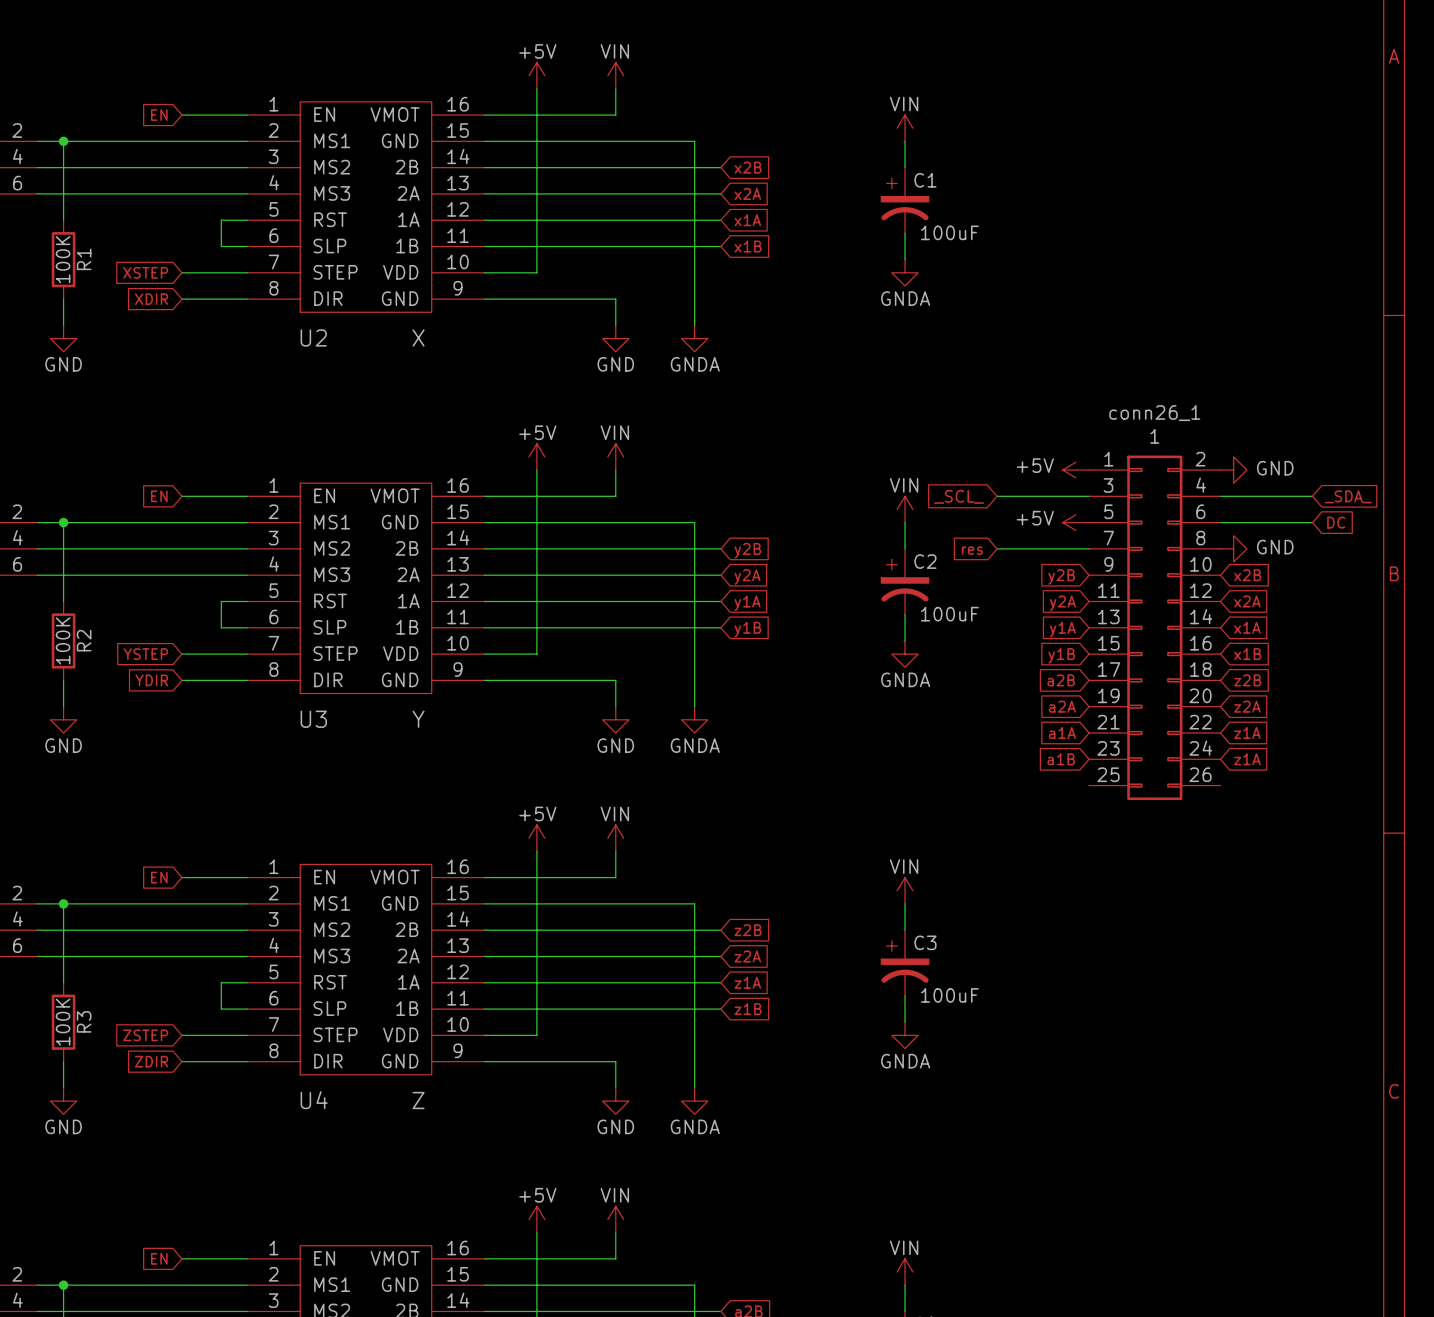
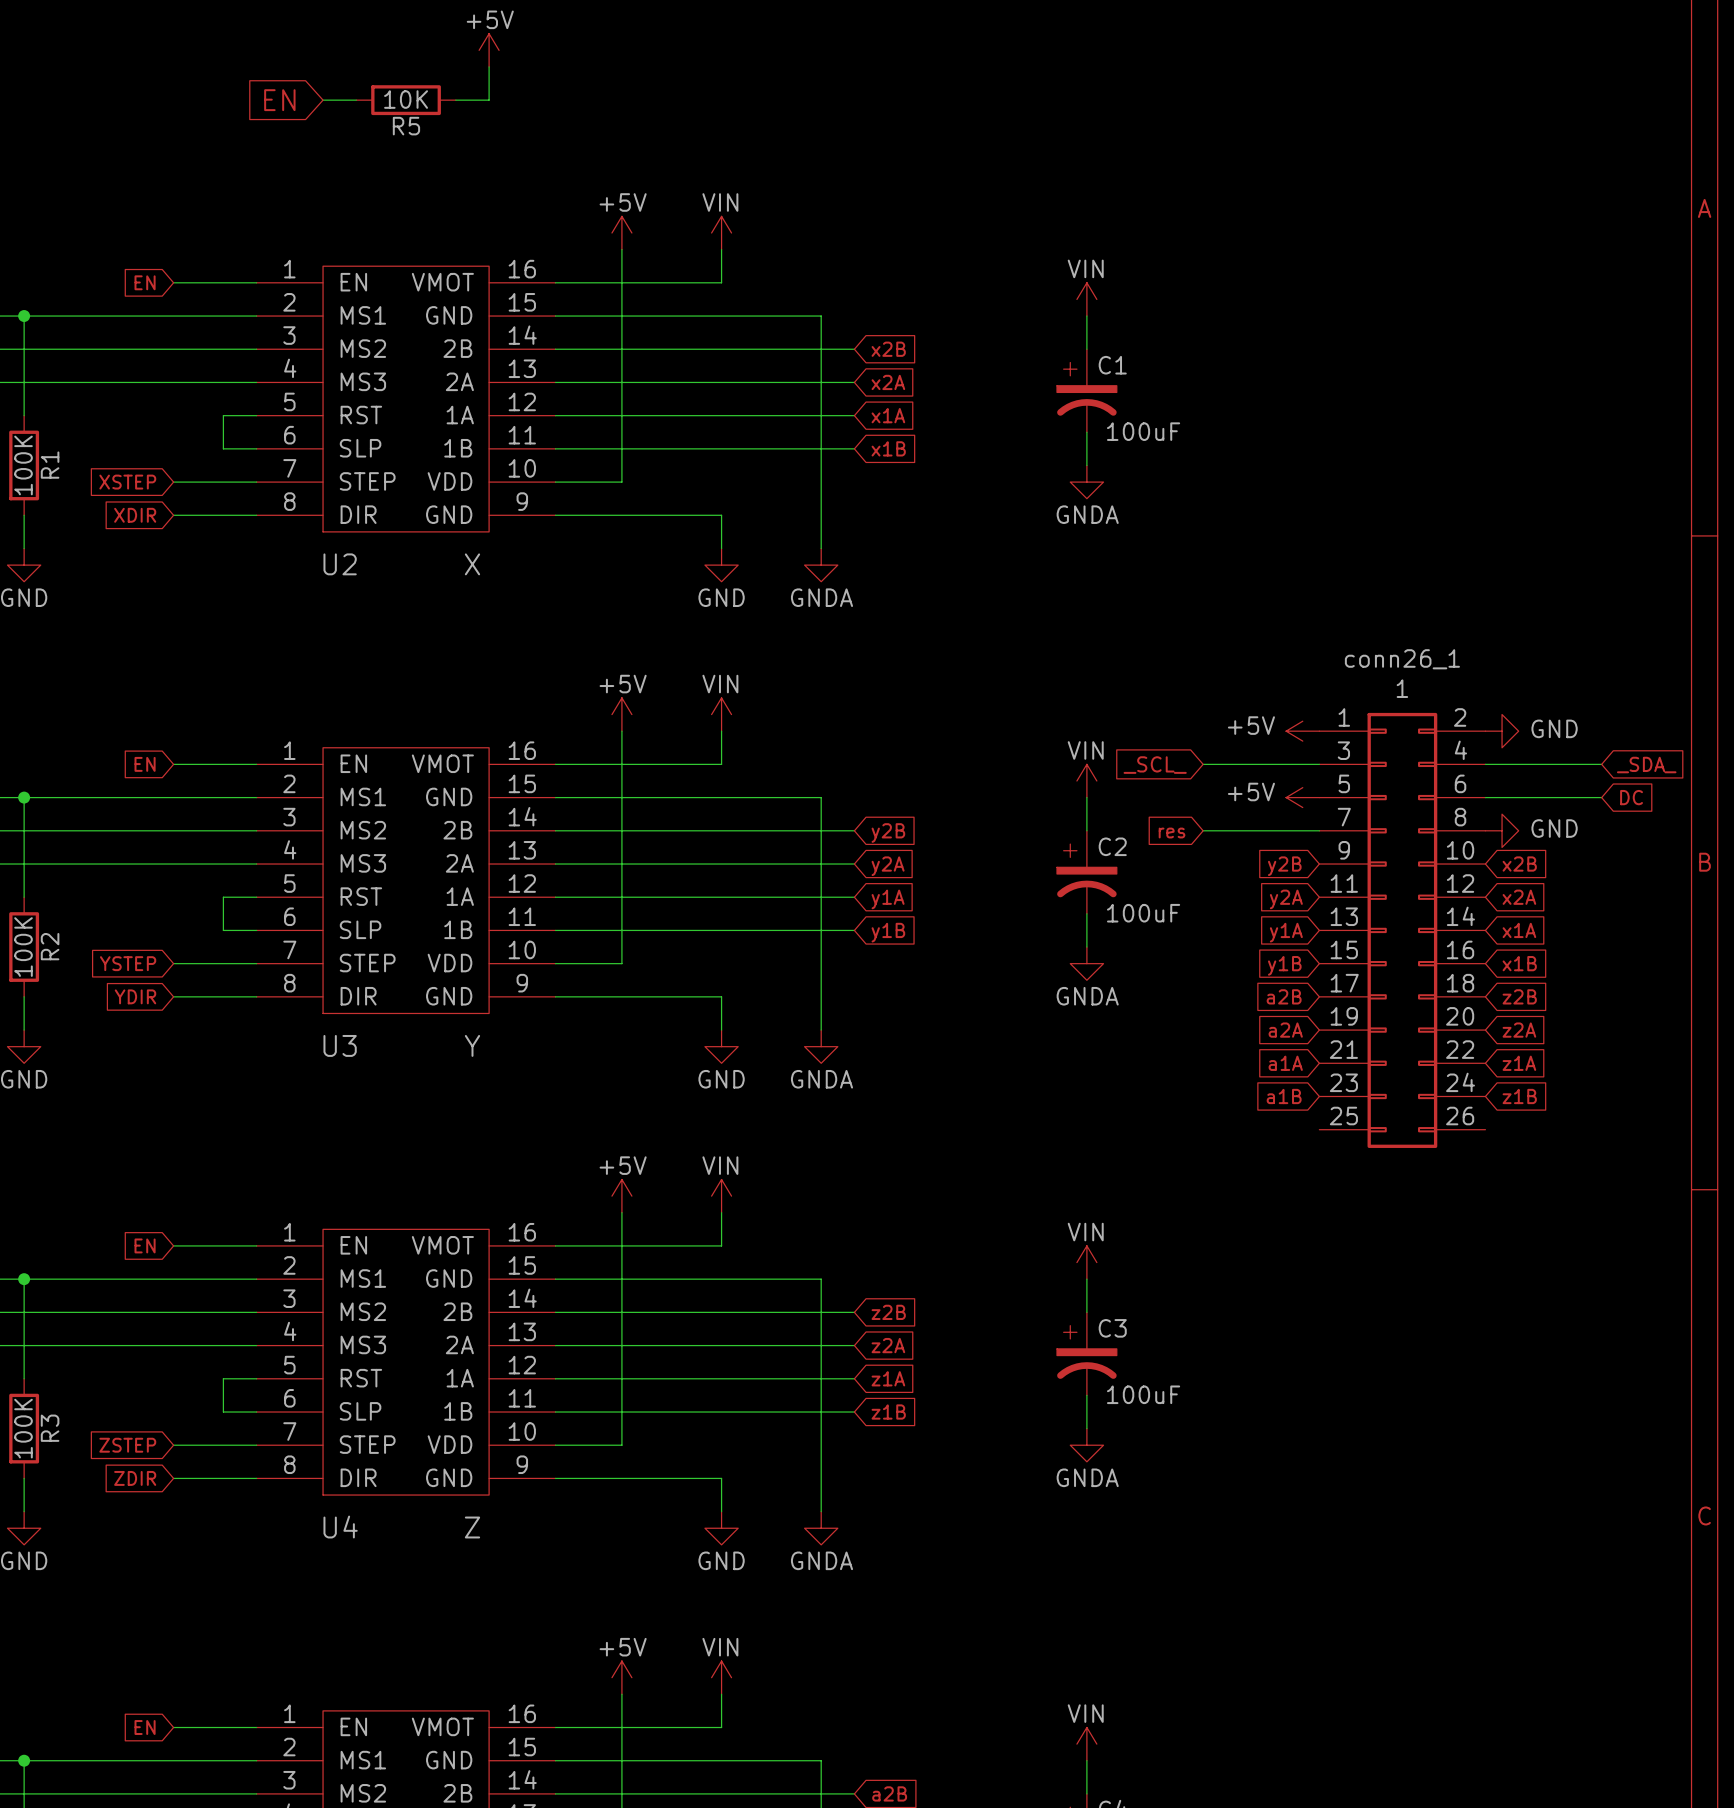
global label: z1A (1247, 759) -> z1B (1519, 1096)

